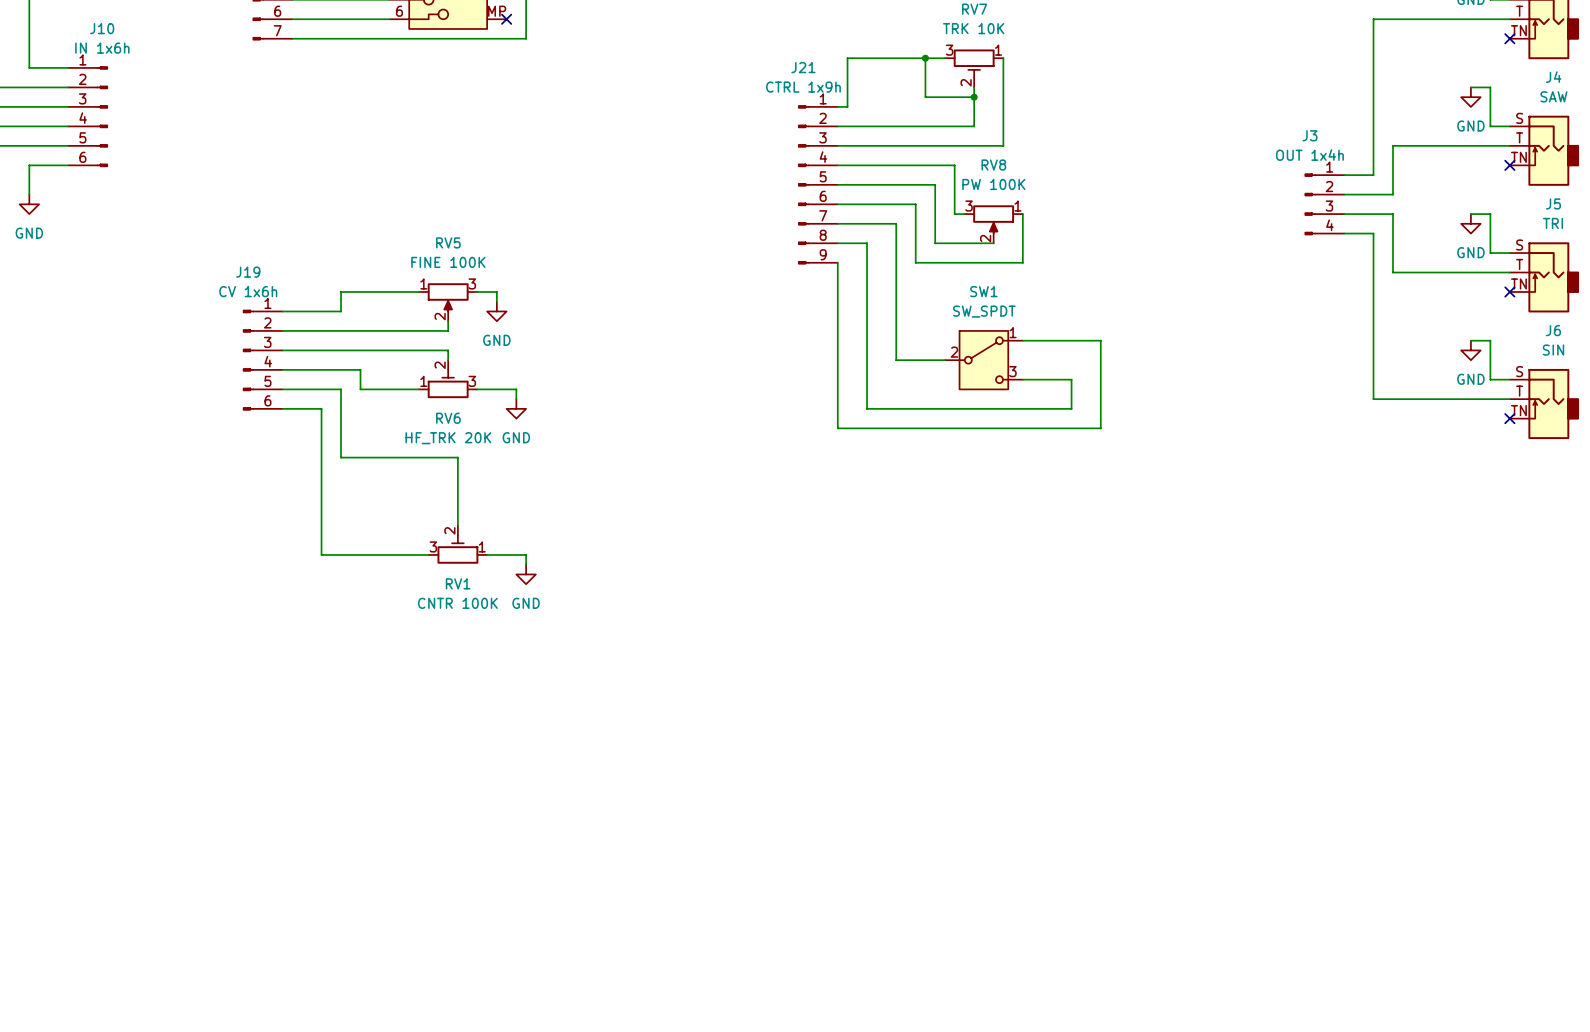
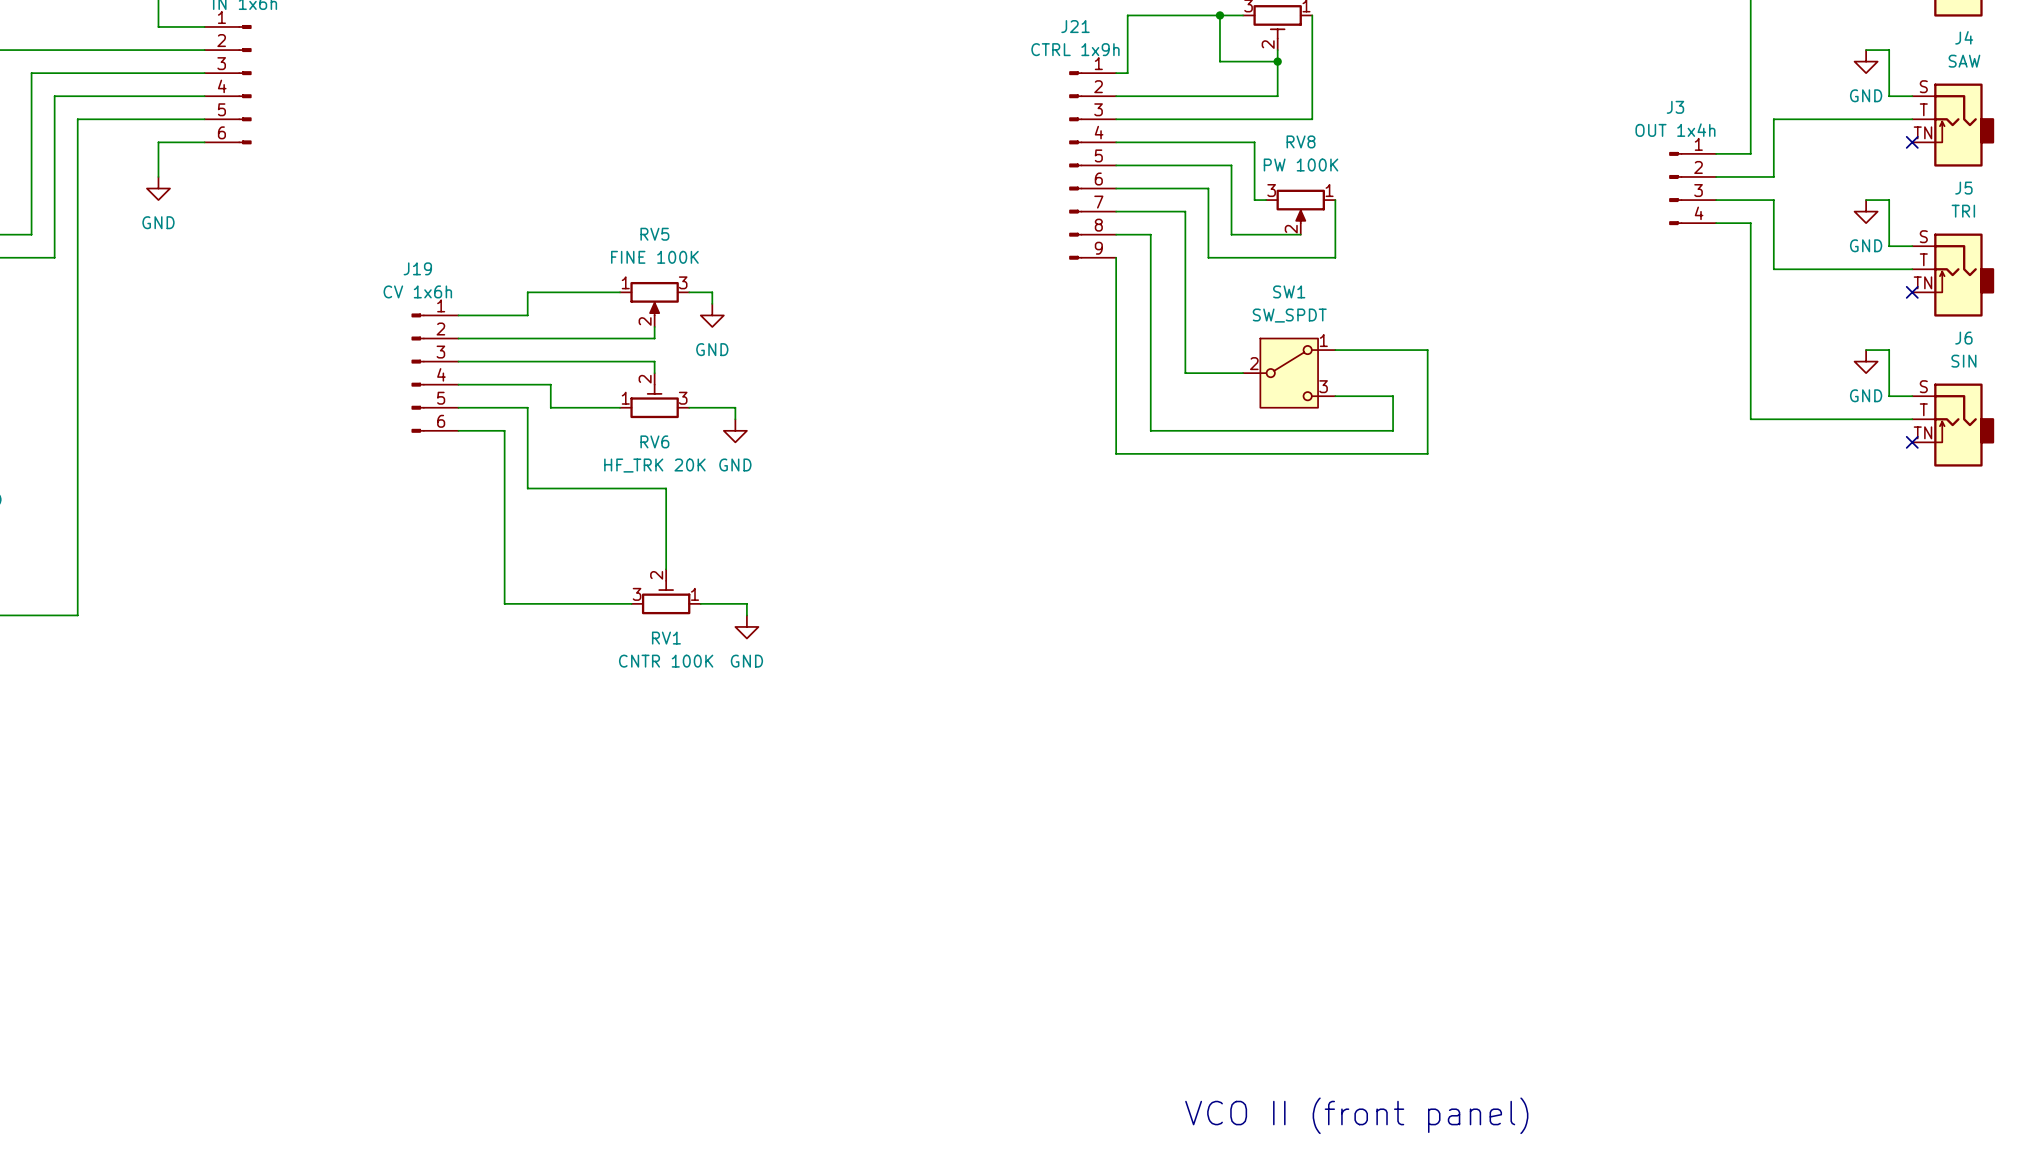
text: none -> VCO II (front panel) (1356, 1115)

